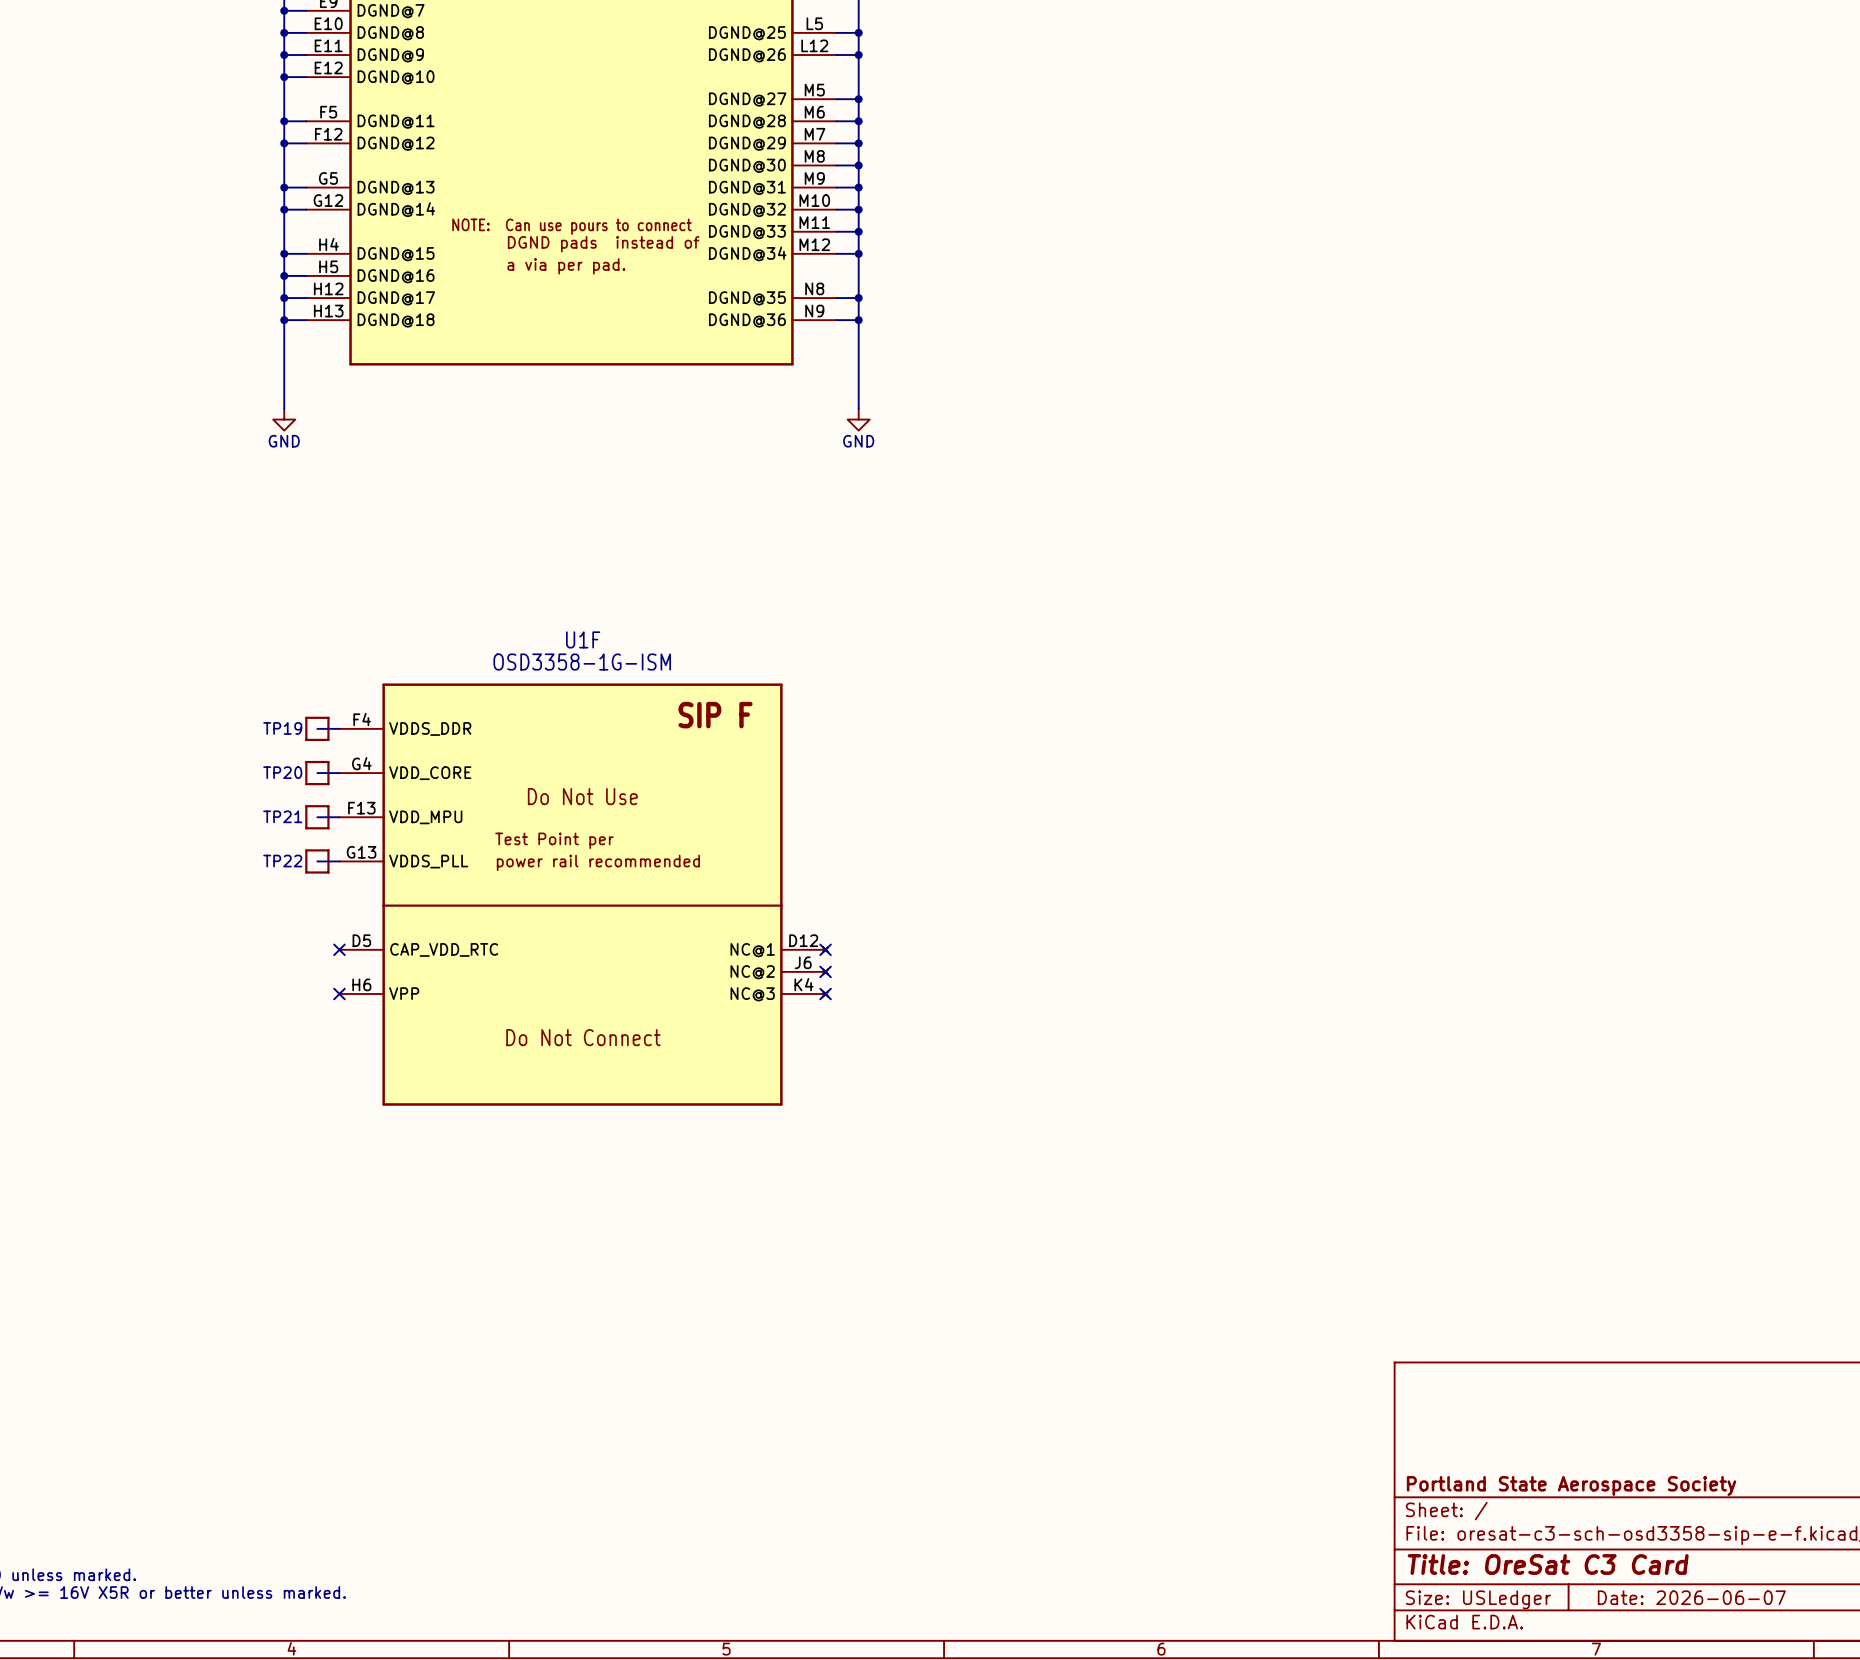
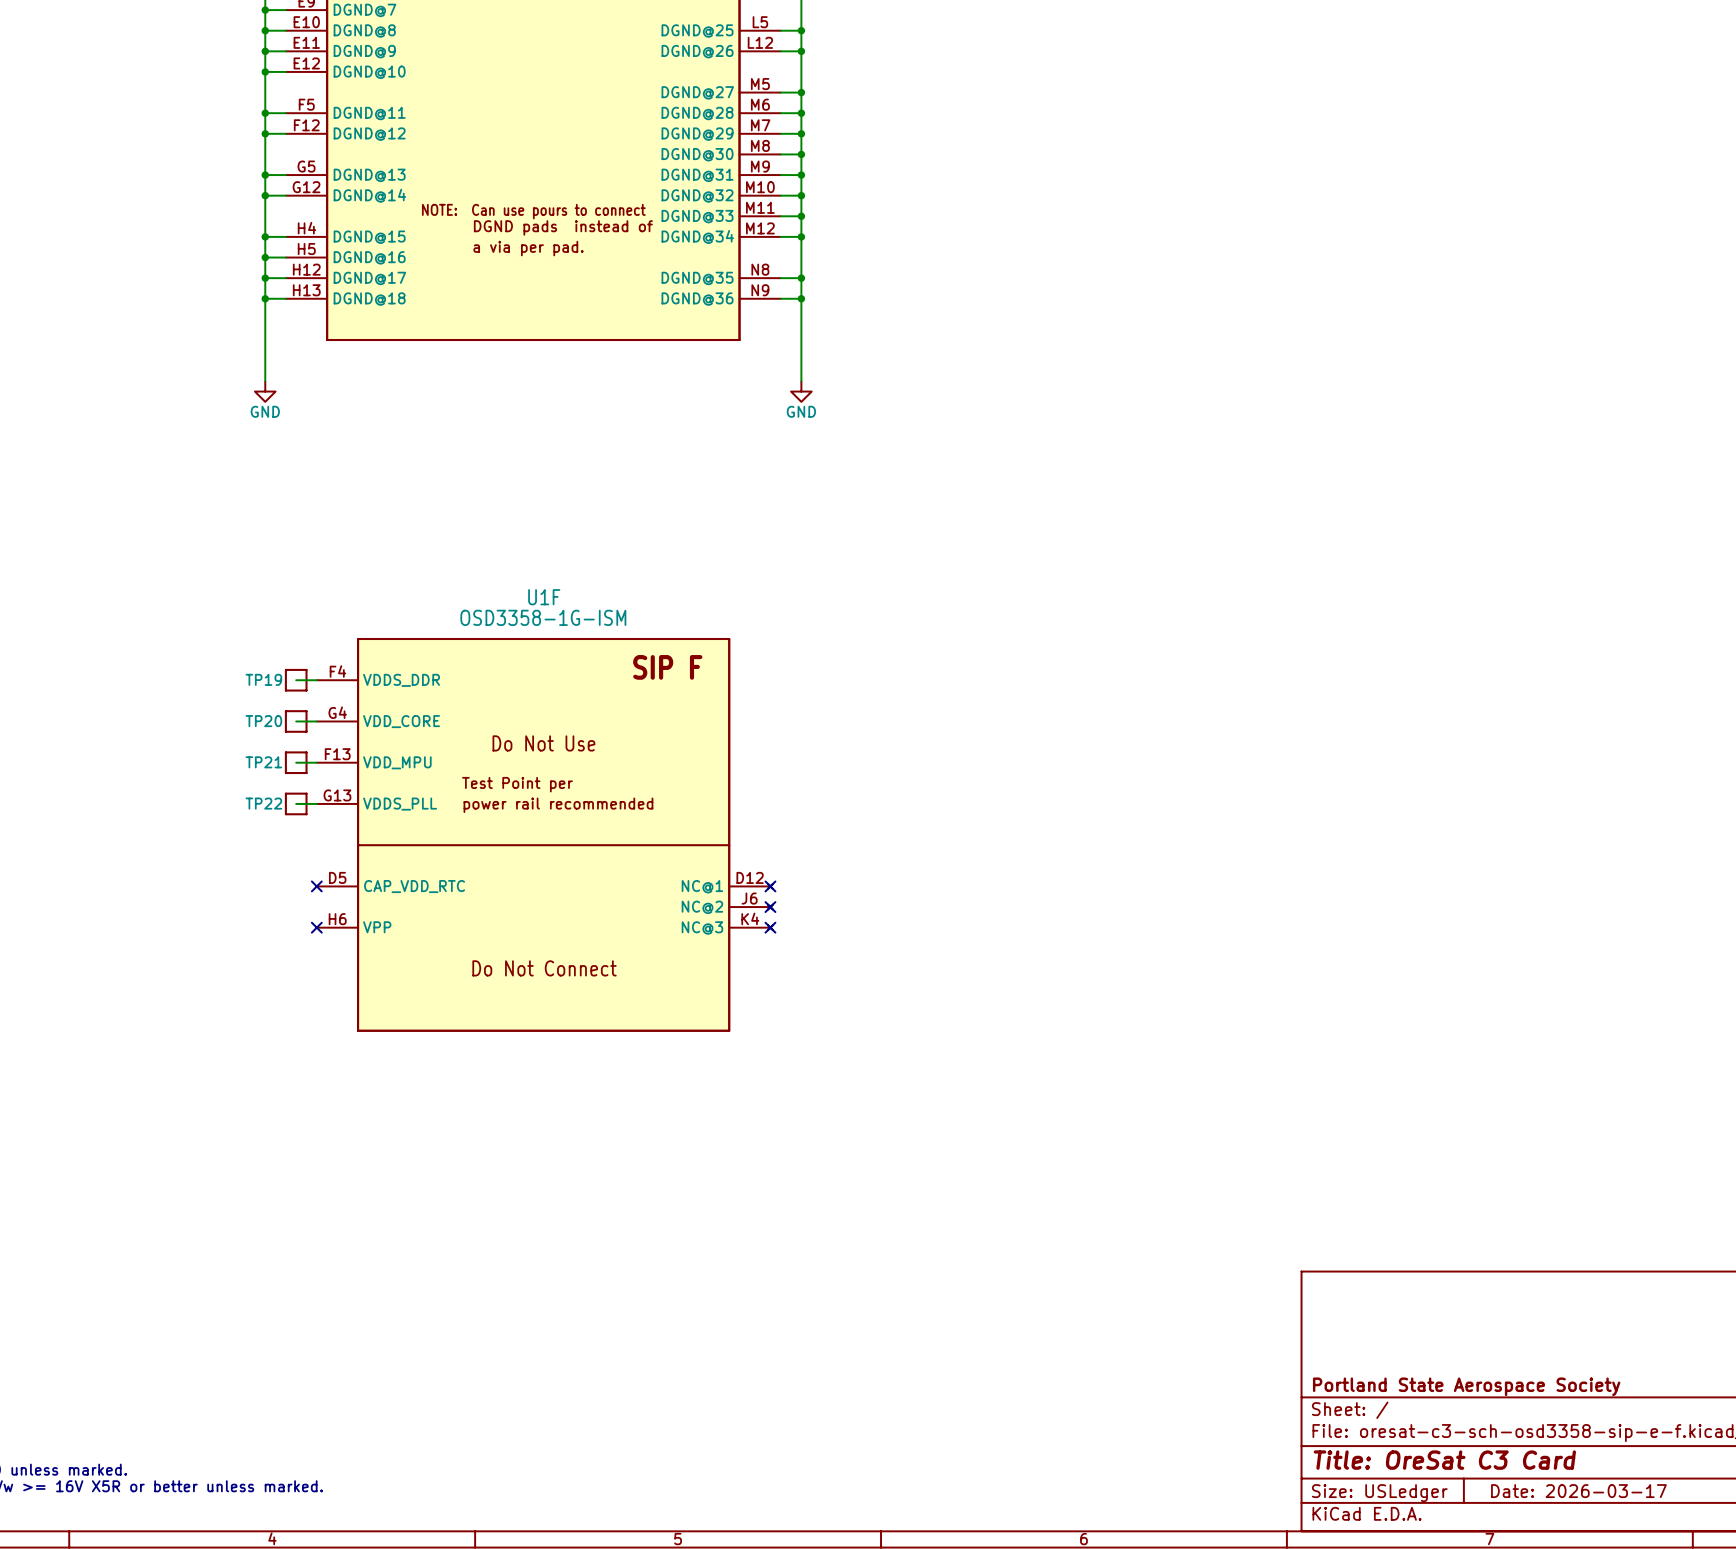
title block: Date: 2026-06-07 (1691, 1597) -> Date: 2026-03-17 (1578, 1491)

